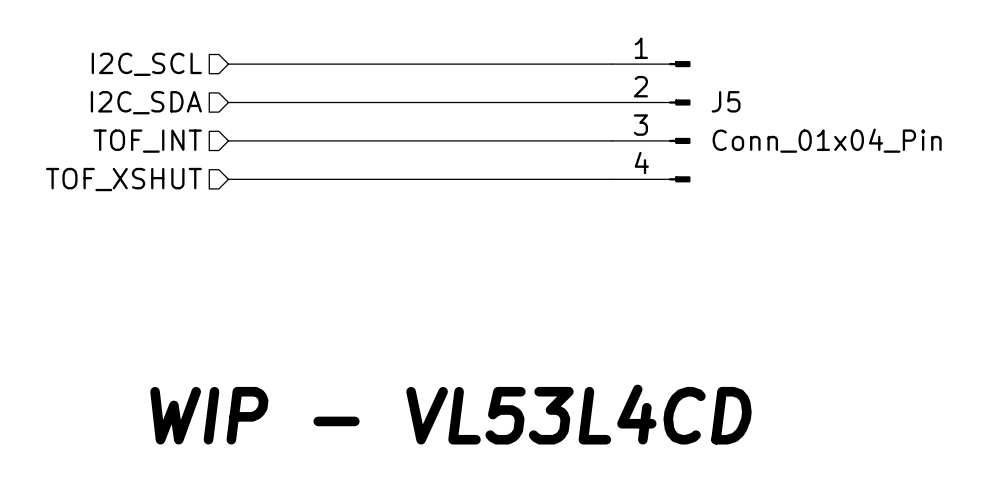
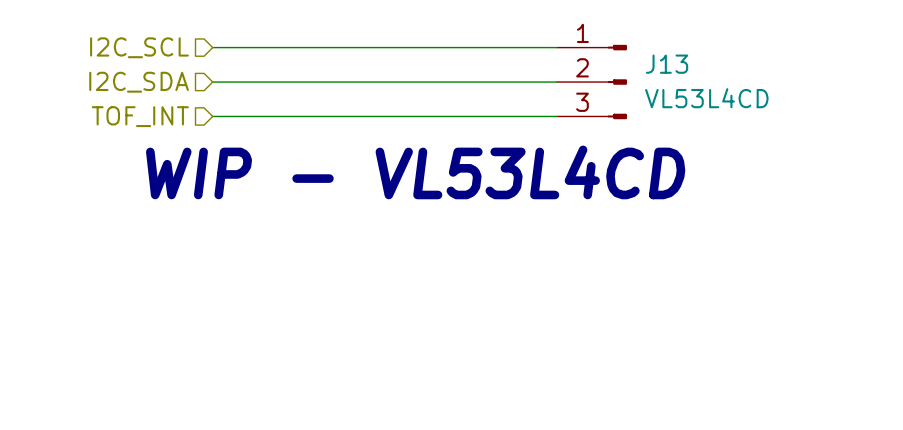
J13: none -> VL53L4CD (592, 82)
J5: Conn_01x04_Pin (651, 121) -> none
hierarchical label: TOF_XSHUT (123, 179) -> none
wire: (228, 179) (612, 179) -> none
text position: WIP - VL53L4CD (450, 414) -> WIP - VL53L4CD (415, 172)

